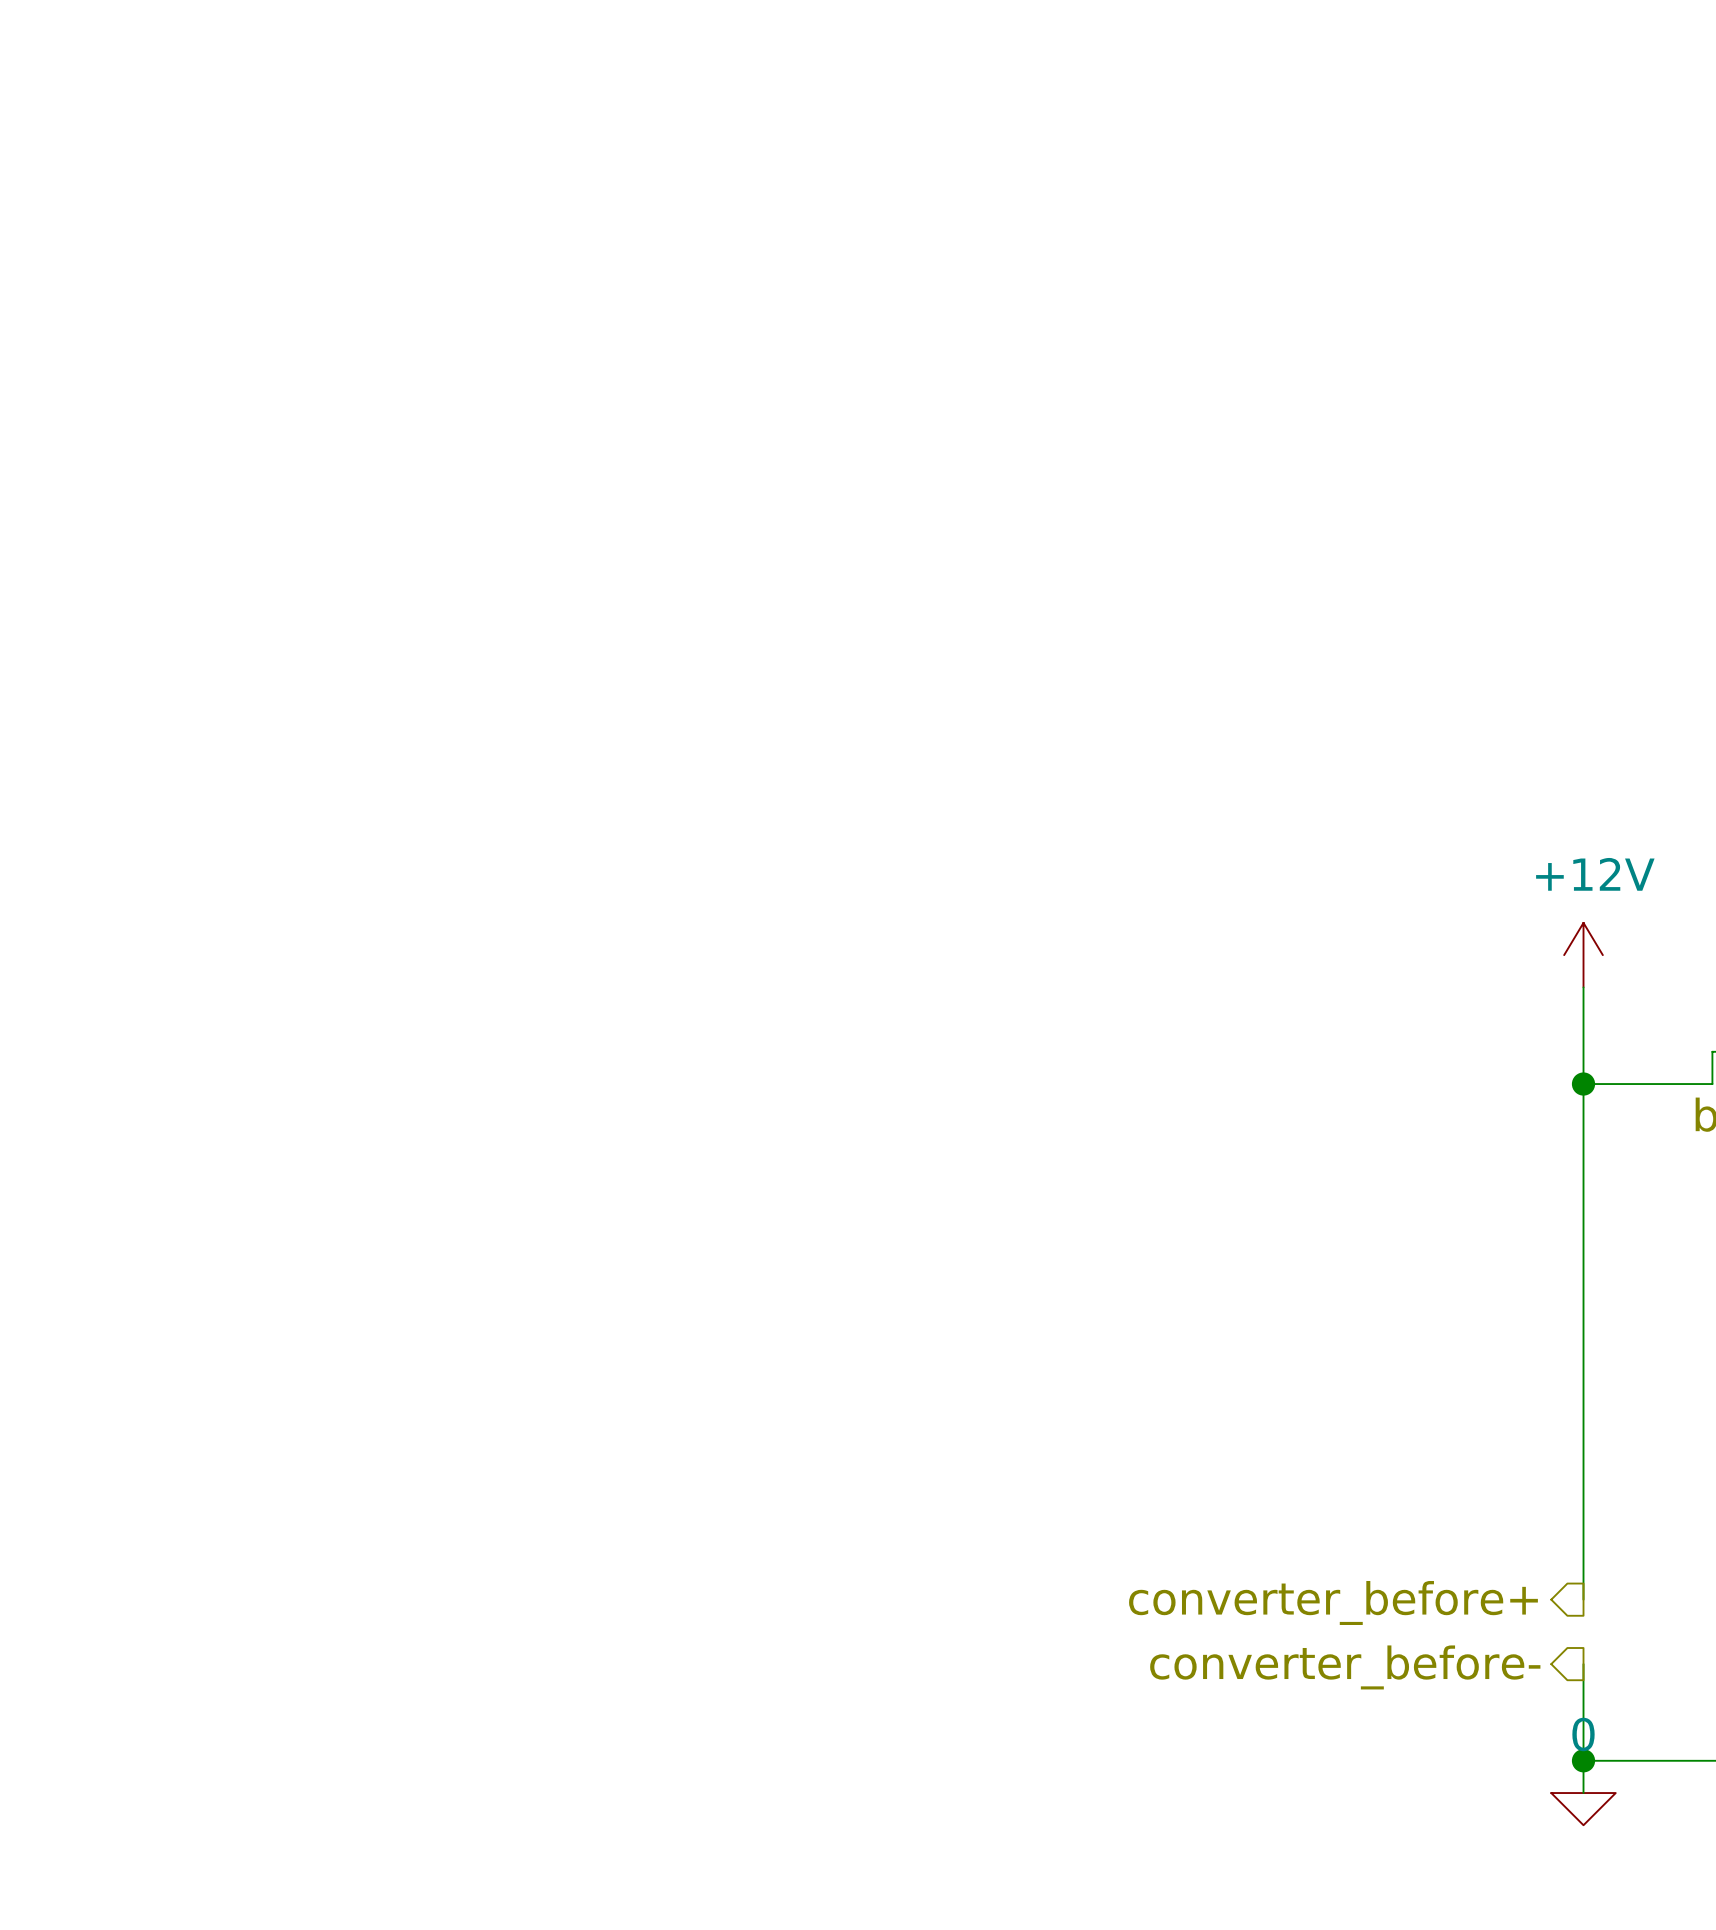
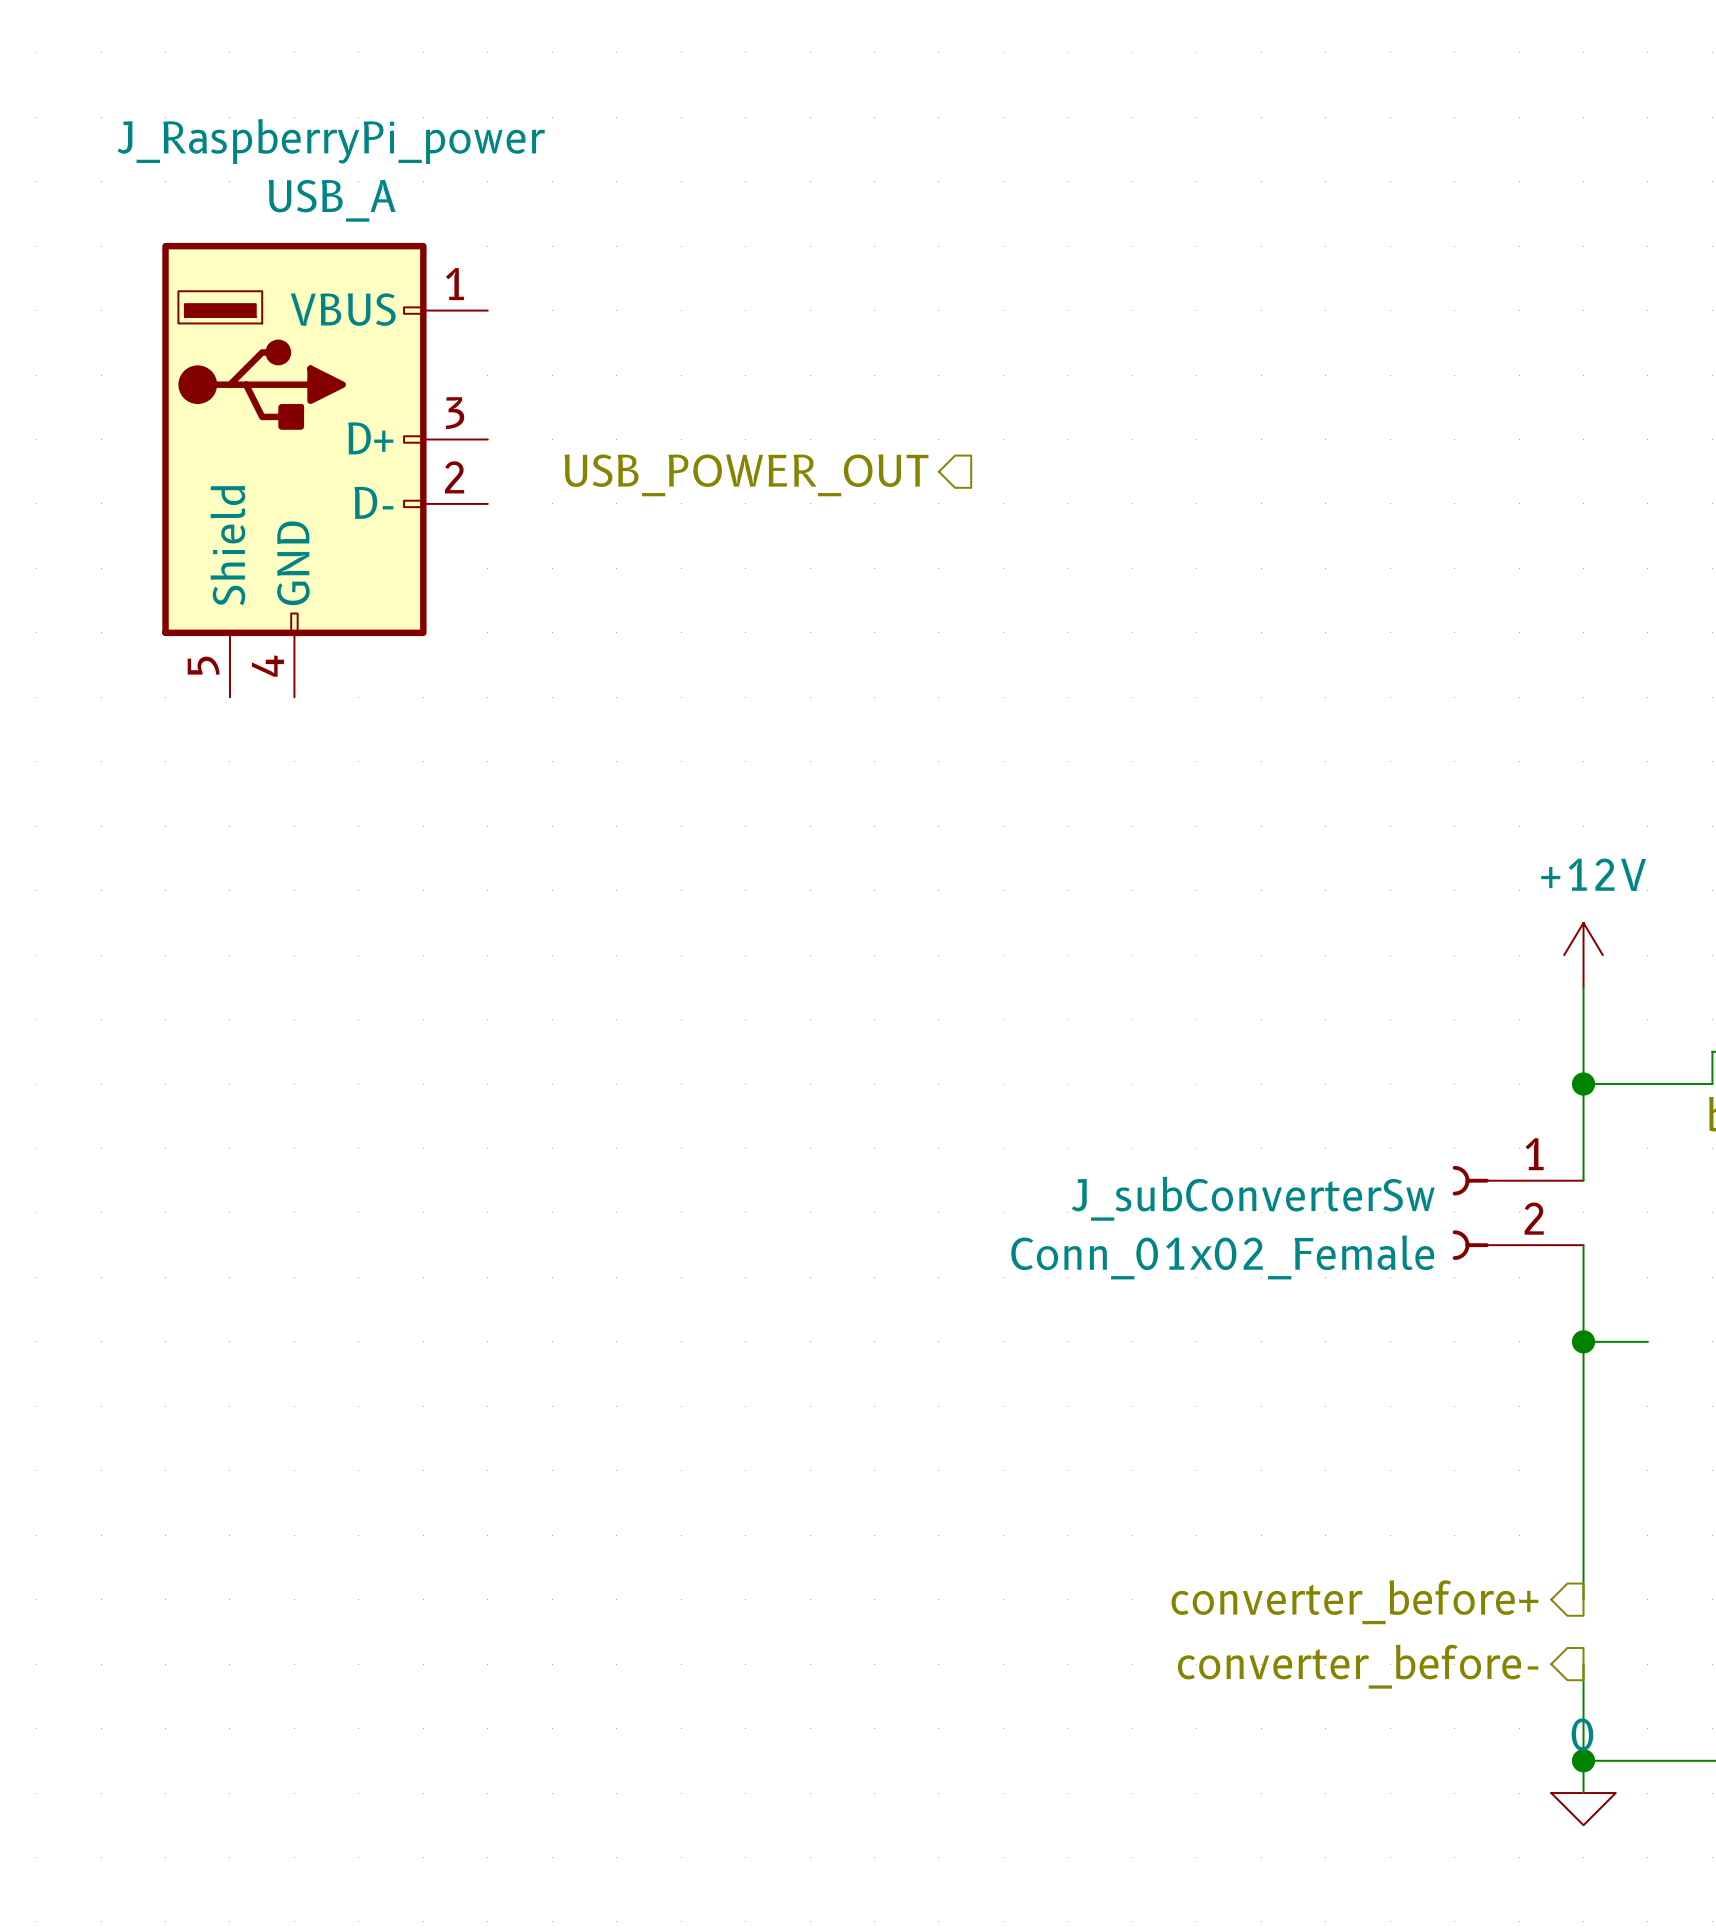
J_RaspberryPi_power: none -> USB_A (325, 470)
hierarchical label: none -> USB_POWER_OUT (746, 475)
wire: (1583, 1180) (1583, 1245) -> none
J_subConverterSw: none -> Conn_01x02_Female (1518, 1212)
wire: none -> (1583, 1341) (1647, 1341)
junction: none -> (1583, 1341)

